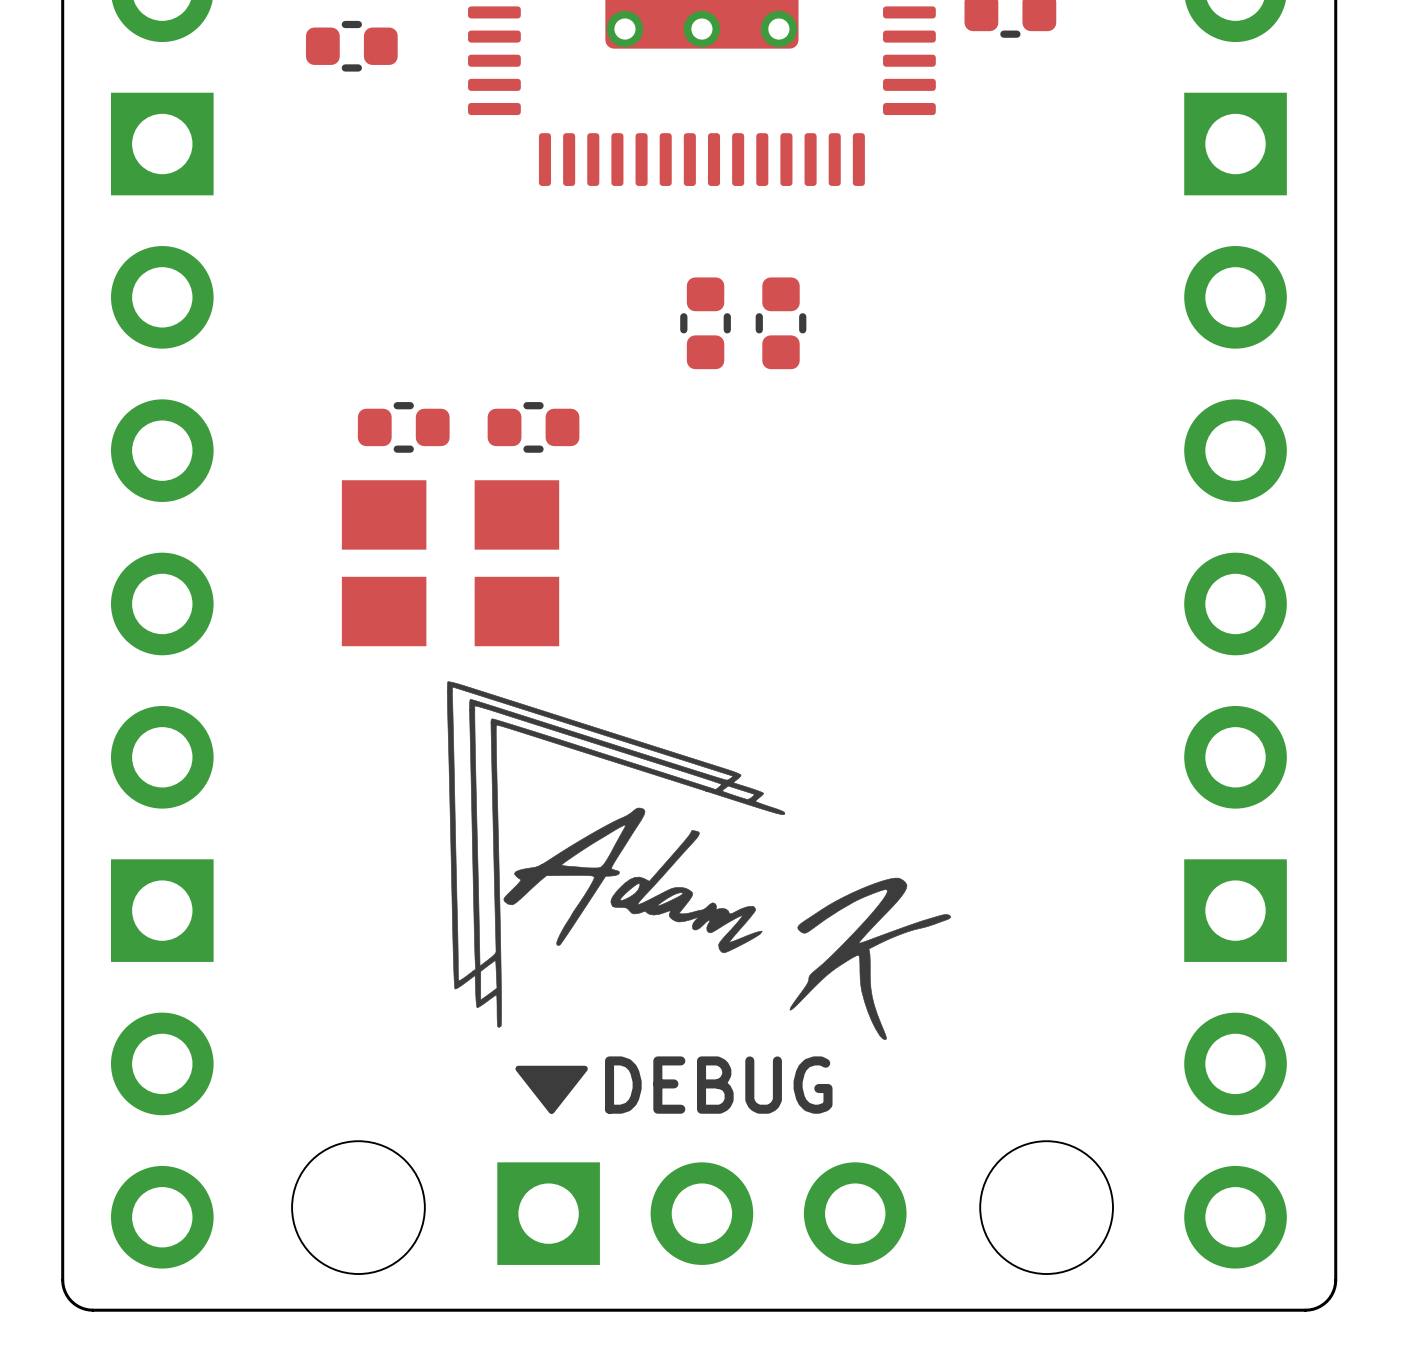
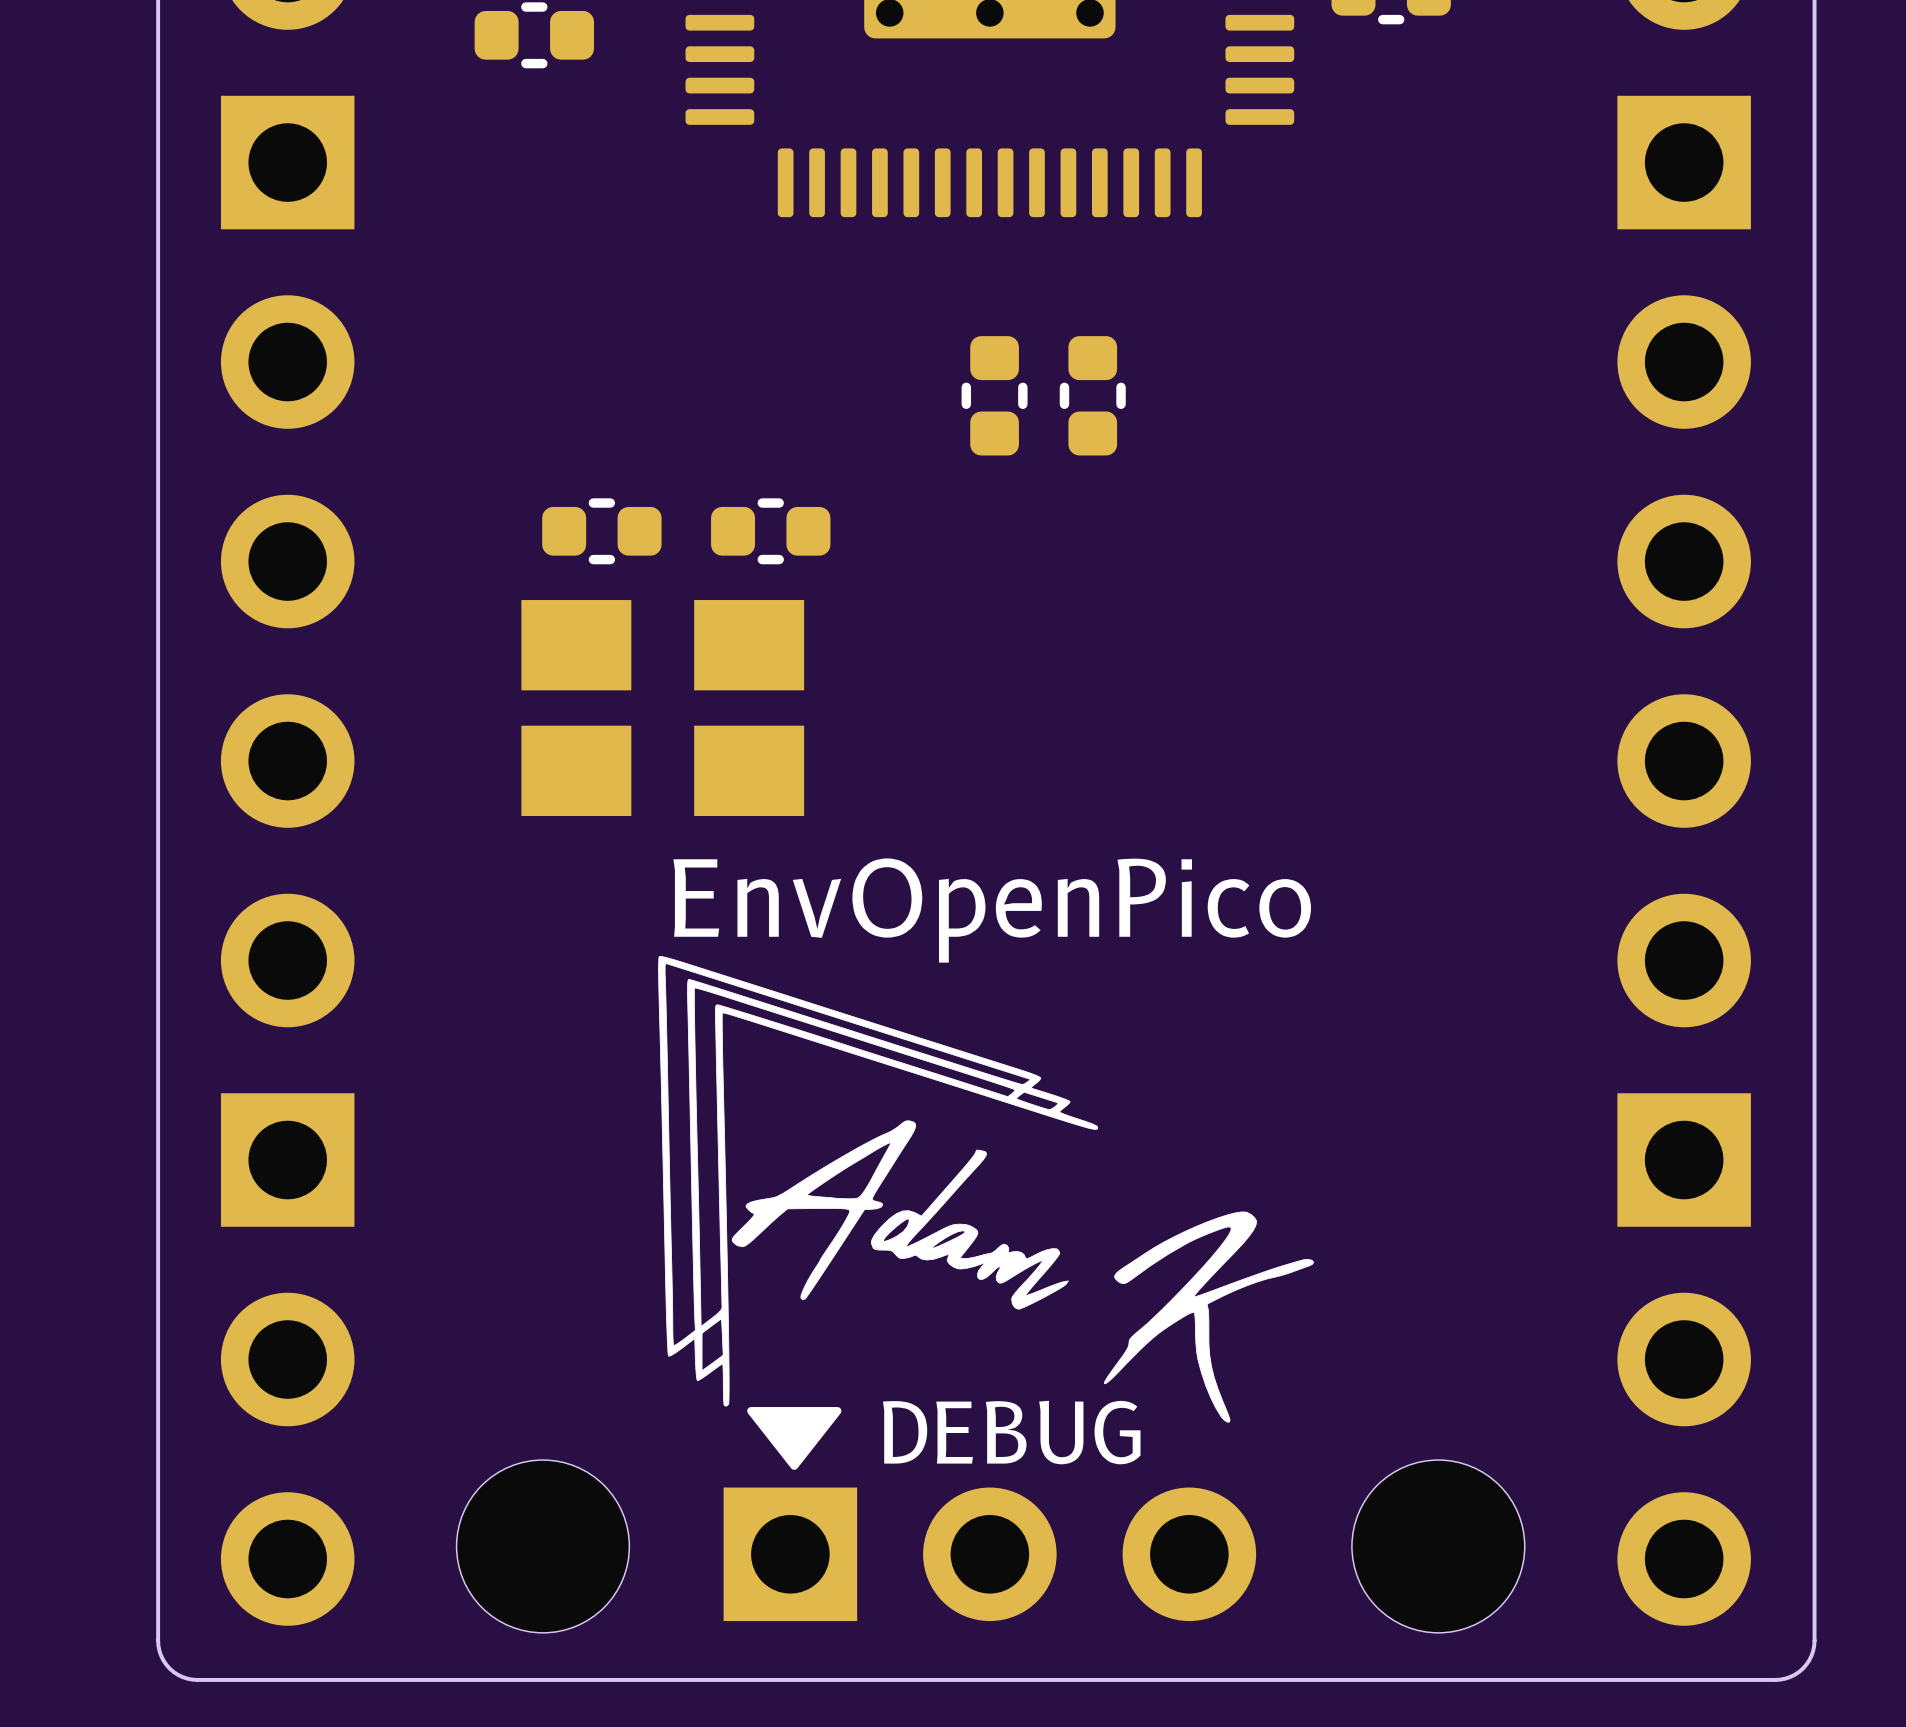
text: none -> EnvOpenPico (992, 910)
drawing position: (698, 860) -> (986, 1189)
text position: DEBUG (718, 1085) -> DEBUG (1011, 1432)
drawing position: (551, 1089) -> (794, 1438)

